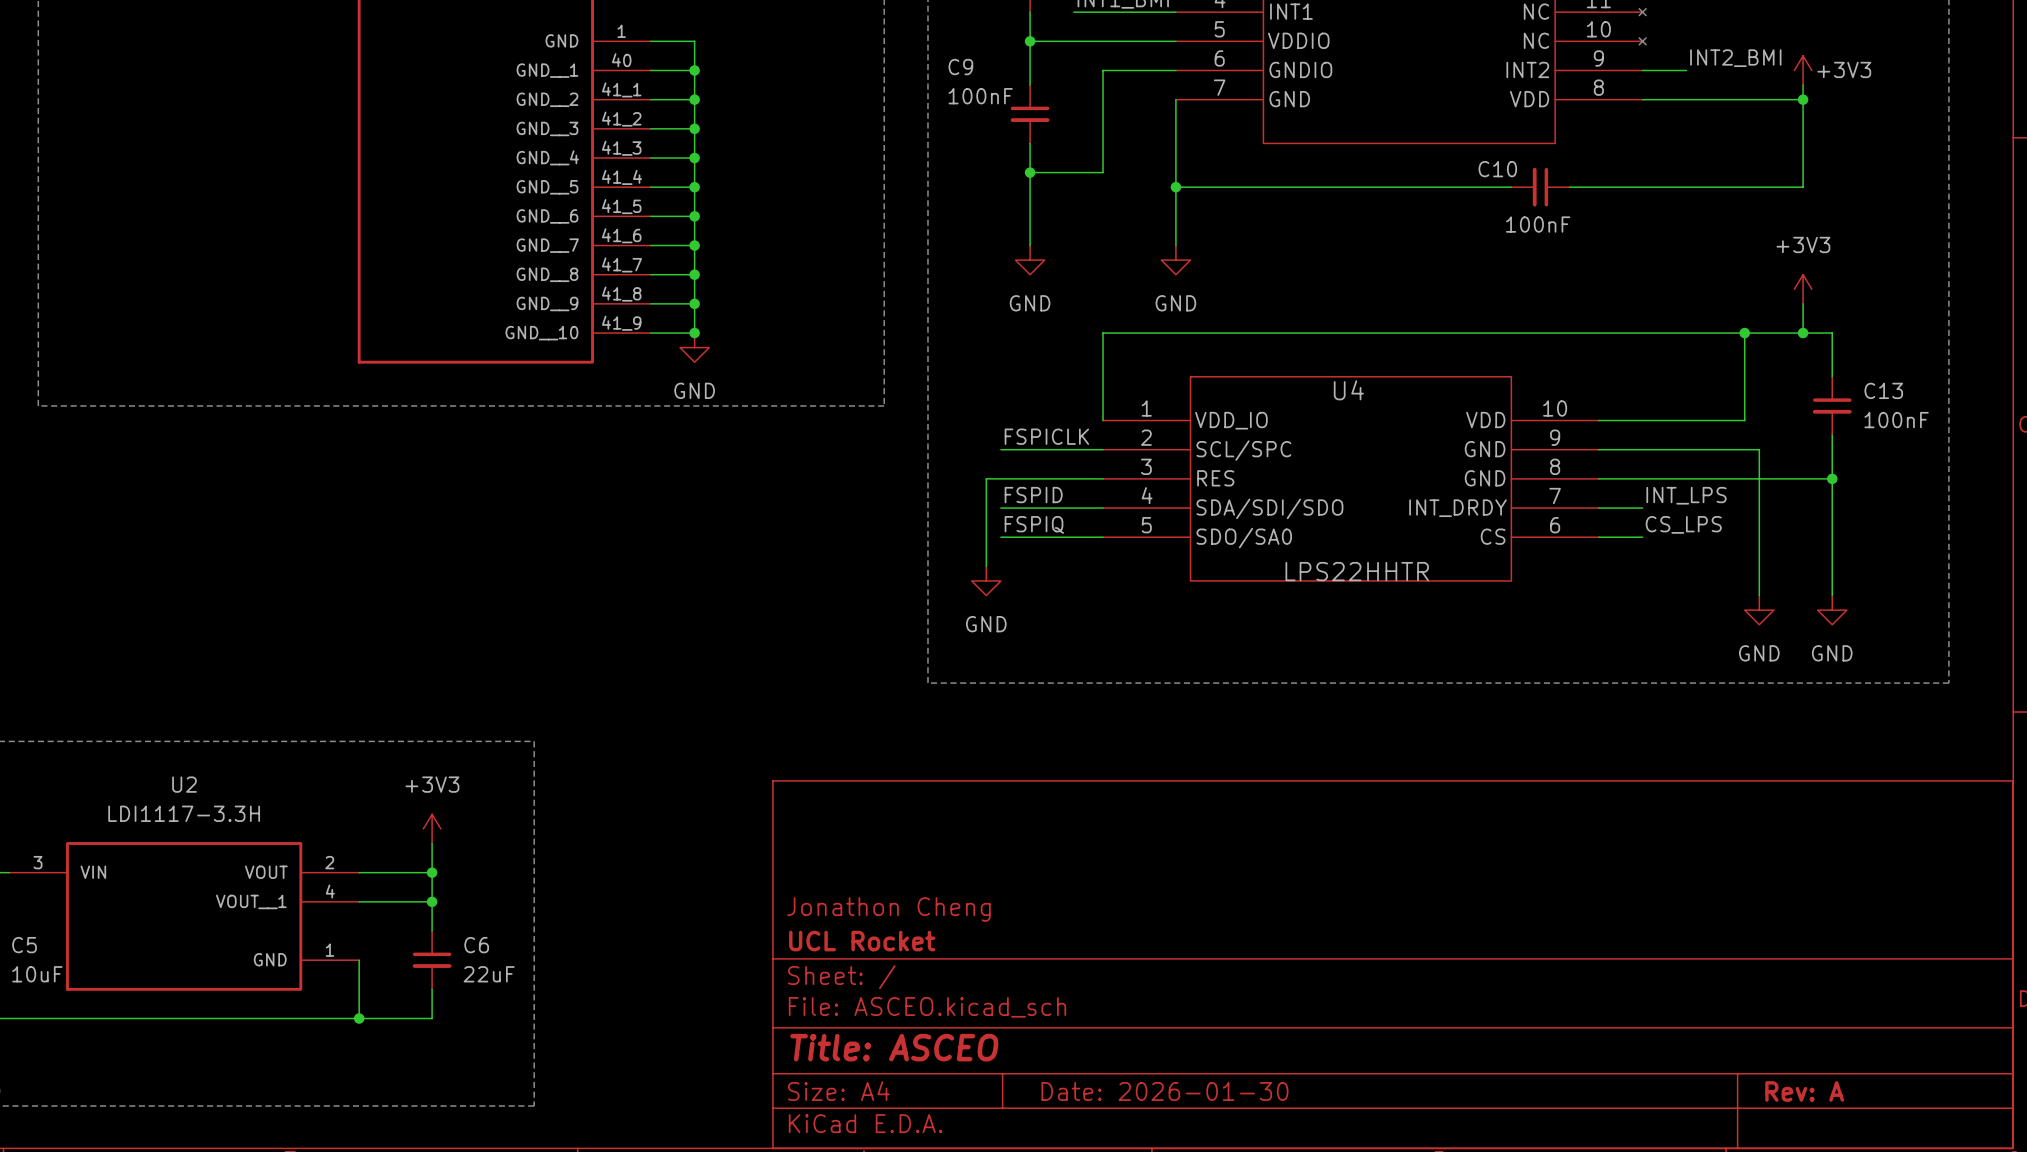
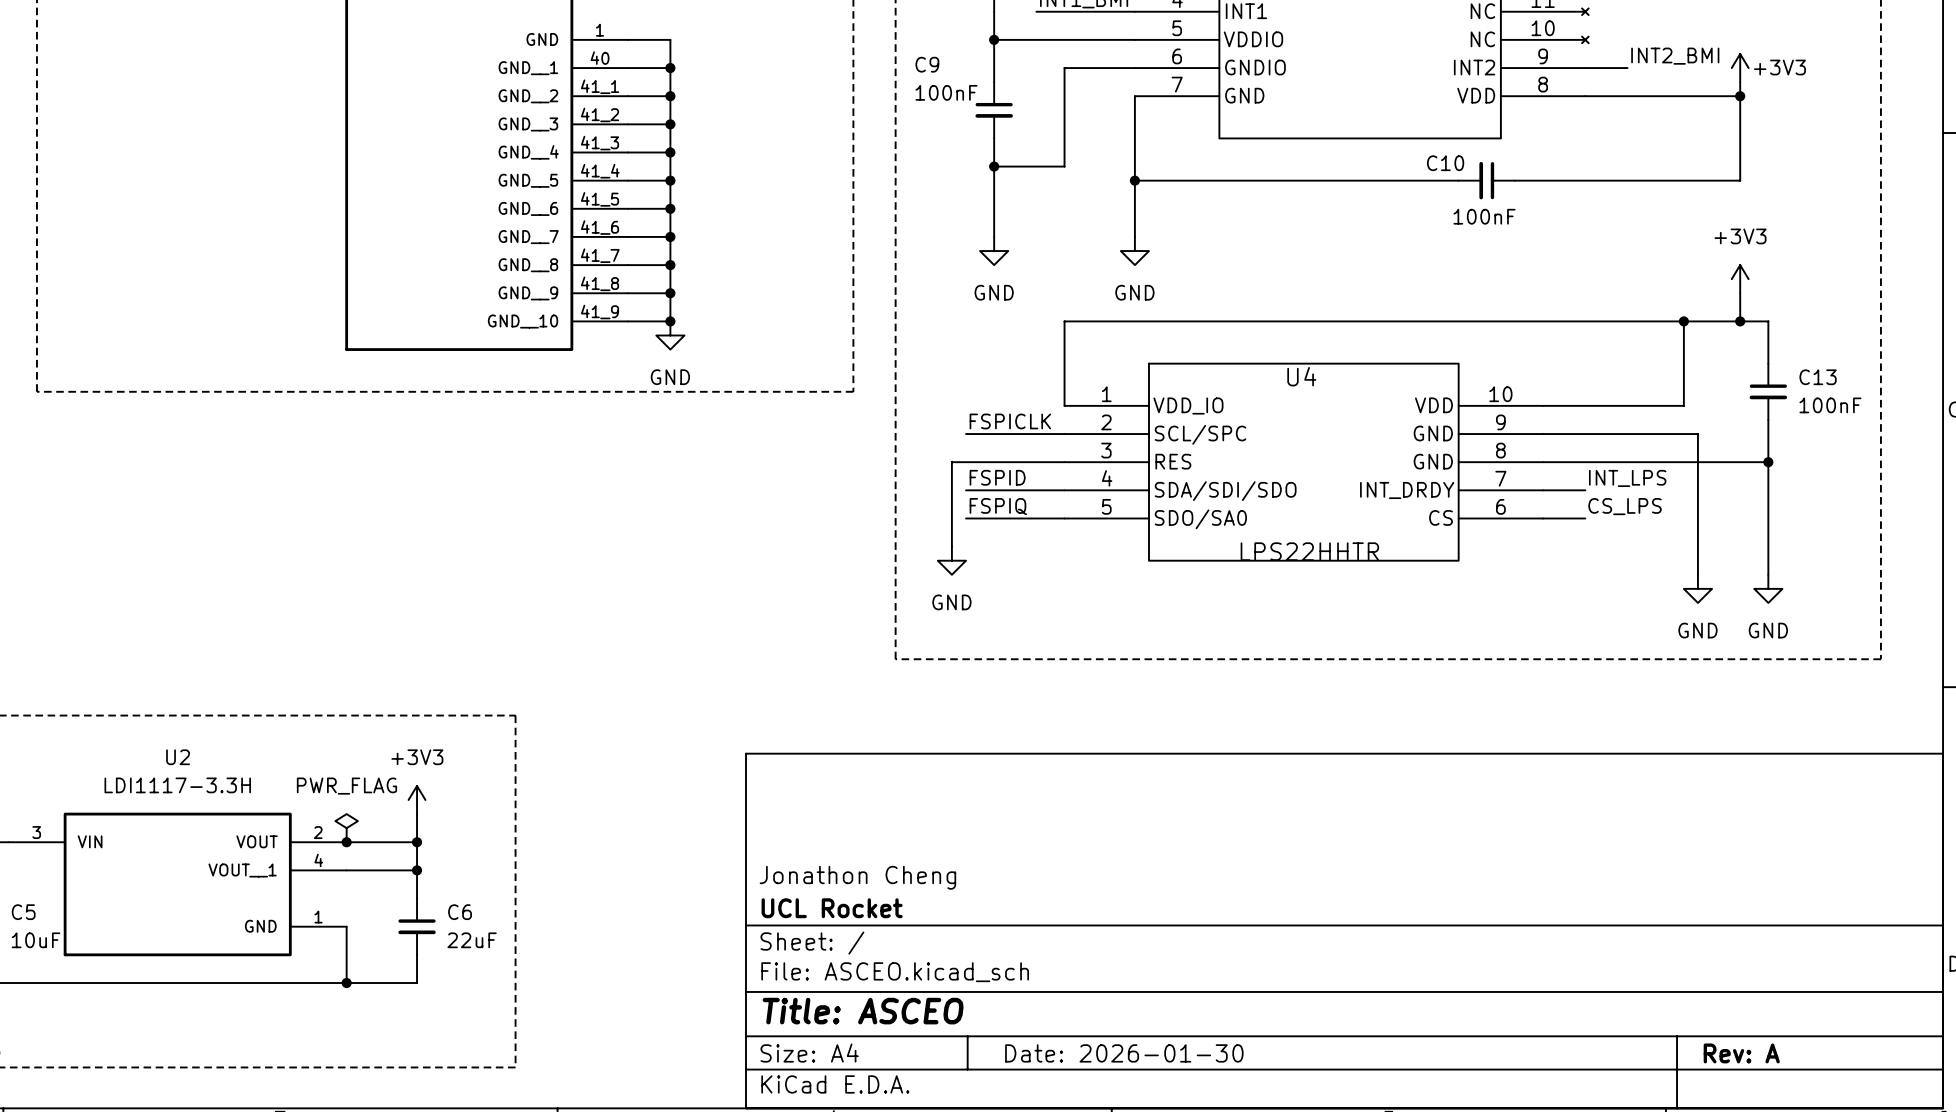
power symbol: none -> PWR_FLAG (346, 828)
junction: none -> (346, 842)

